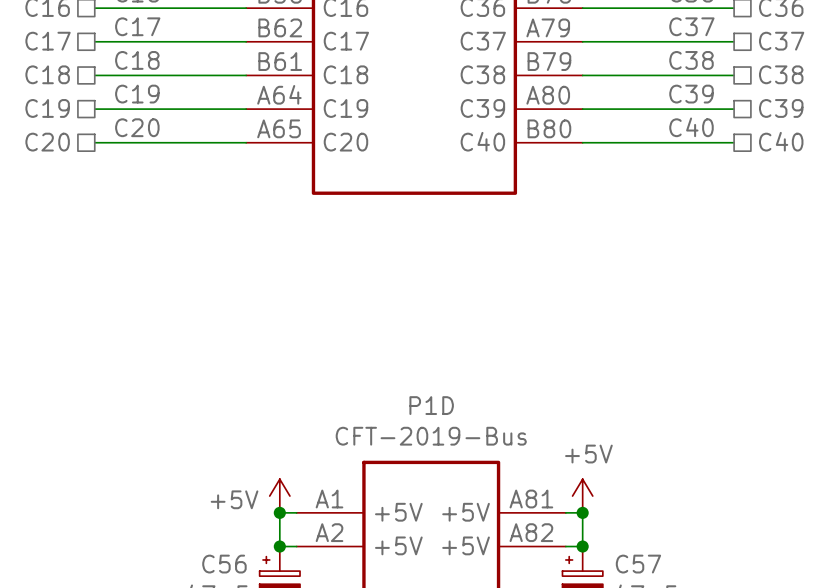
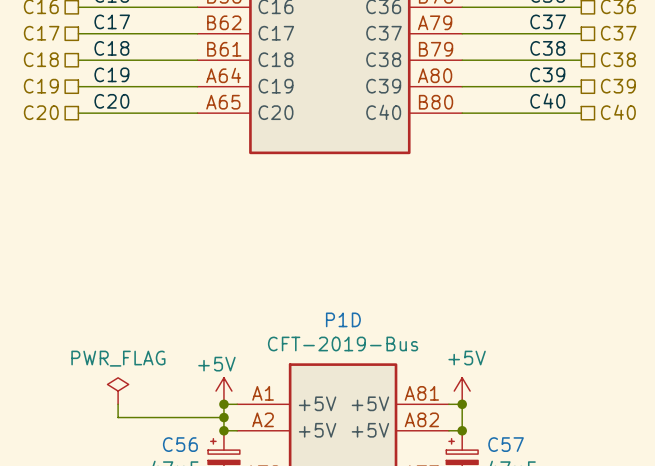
power symbol: none -> PWR_FLAG (118, 391)
power symbol text position: +5V (234, 499) -> +5V (216, 364)
wire: none -> (118, 404) (118, 417) (223, 417)
junction: none -> (223, 417)

